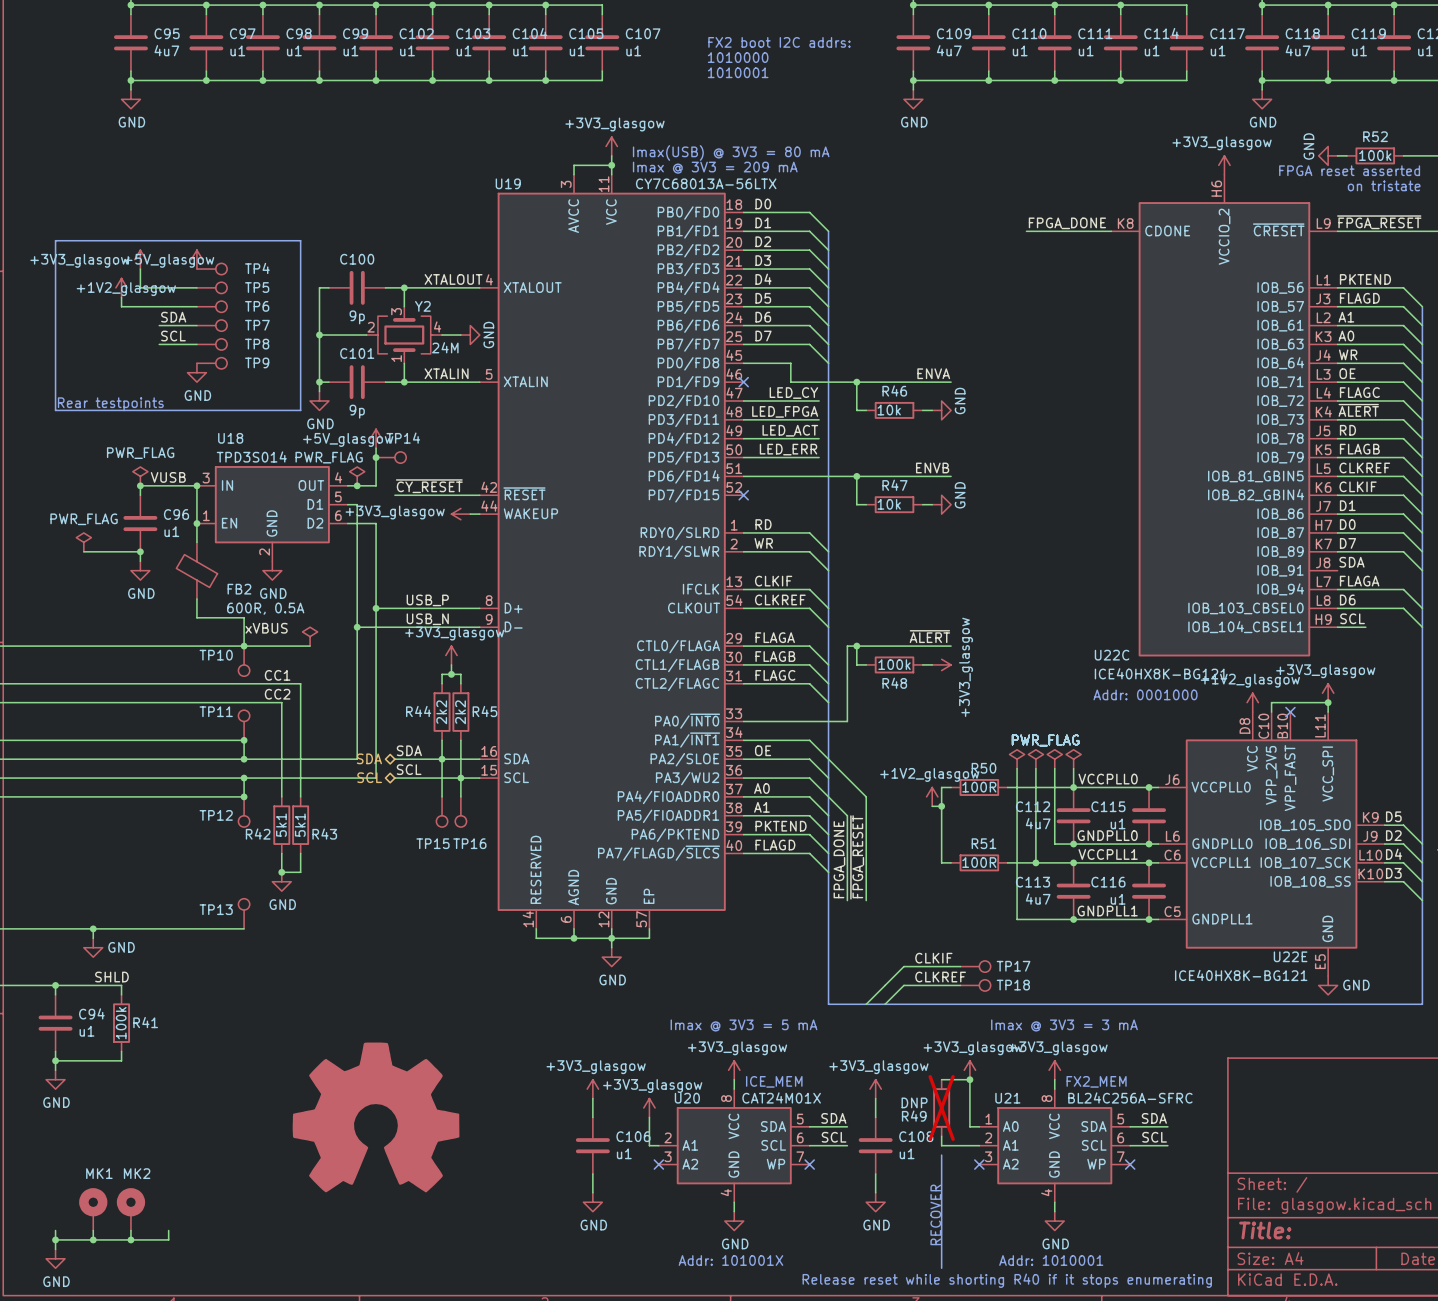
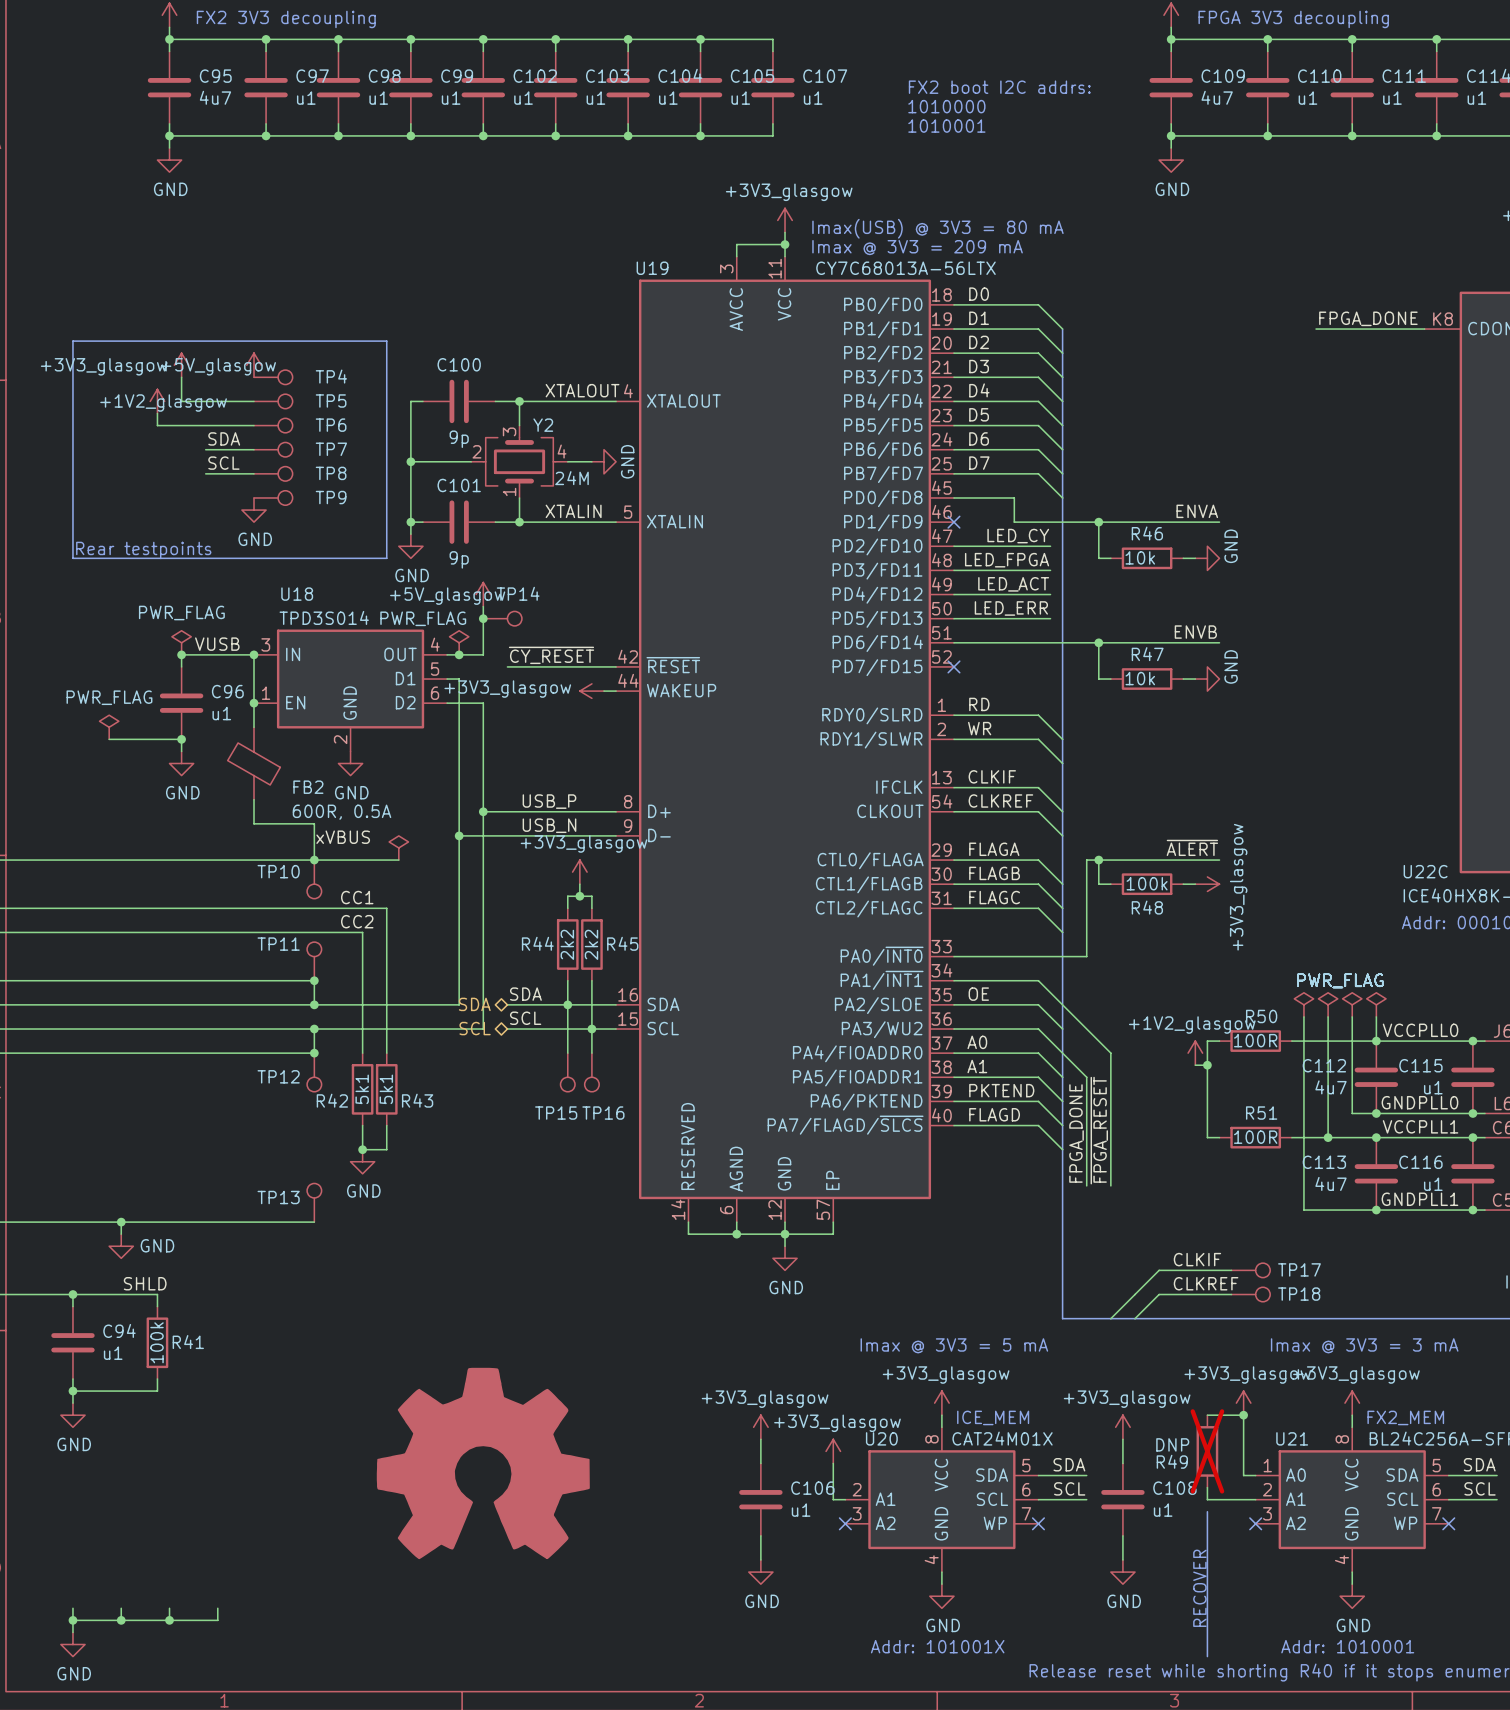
MK1: (93, 1209) -> none
MK2: (130, 1209) -> none

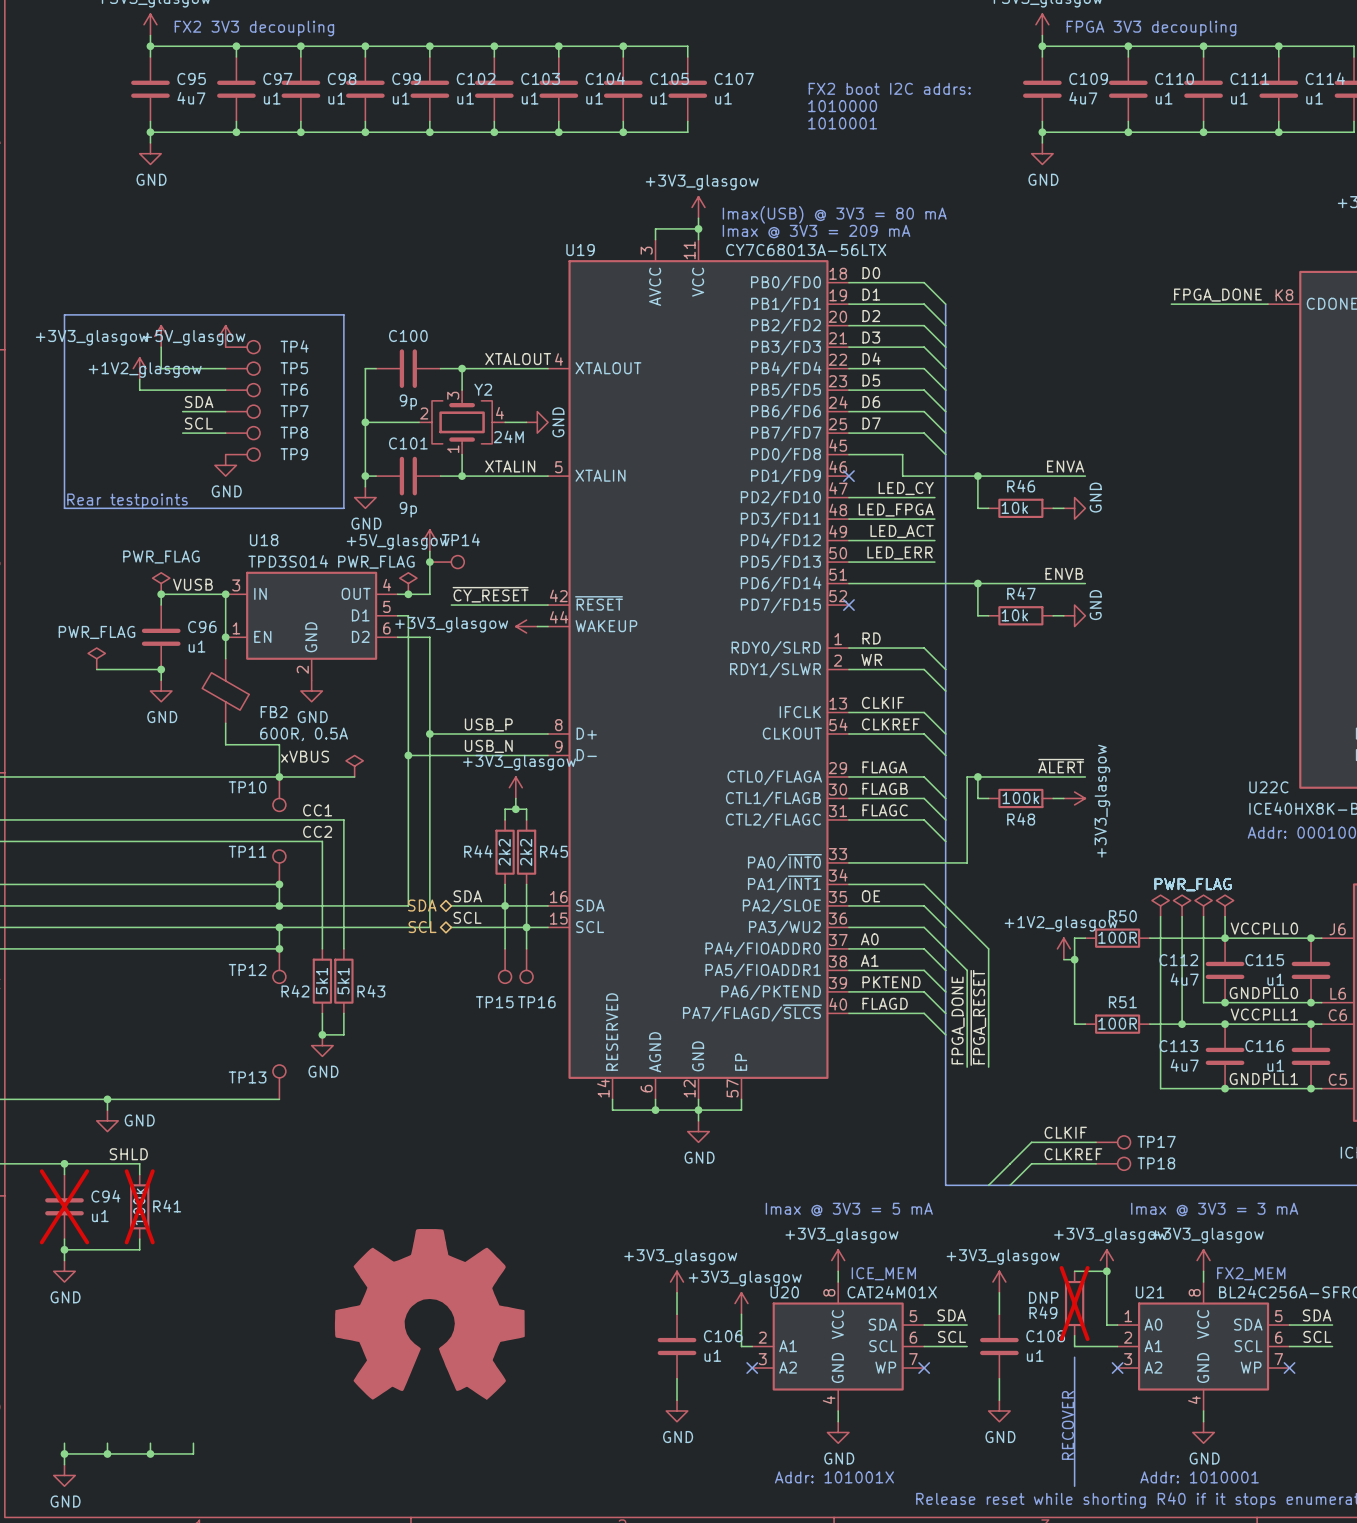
C94 do-not-place cross: none -> (64, 1206)
R41 do-not-place cross: none -> (139, 1206)

